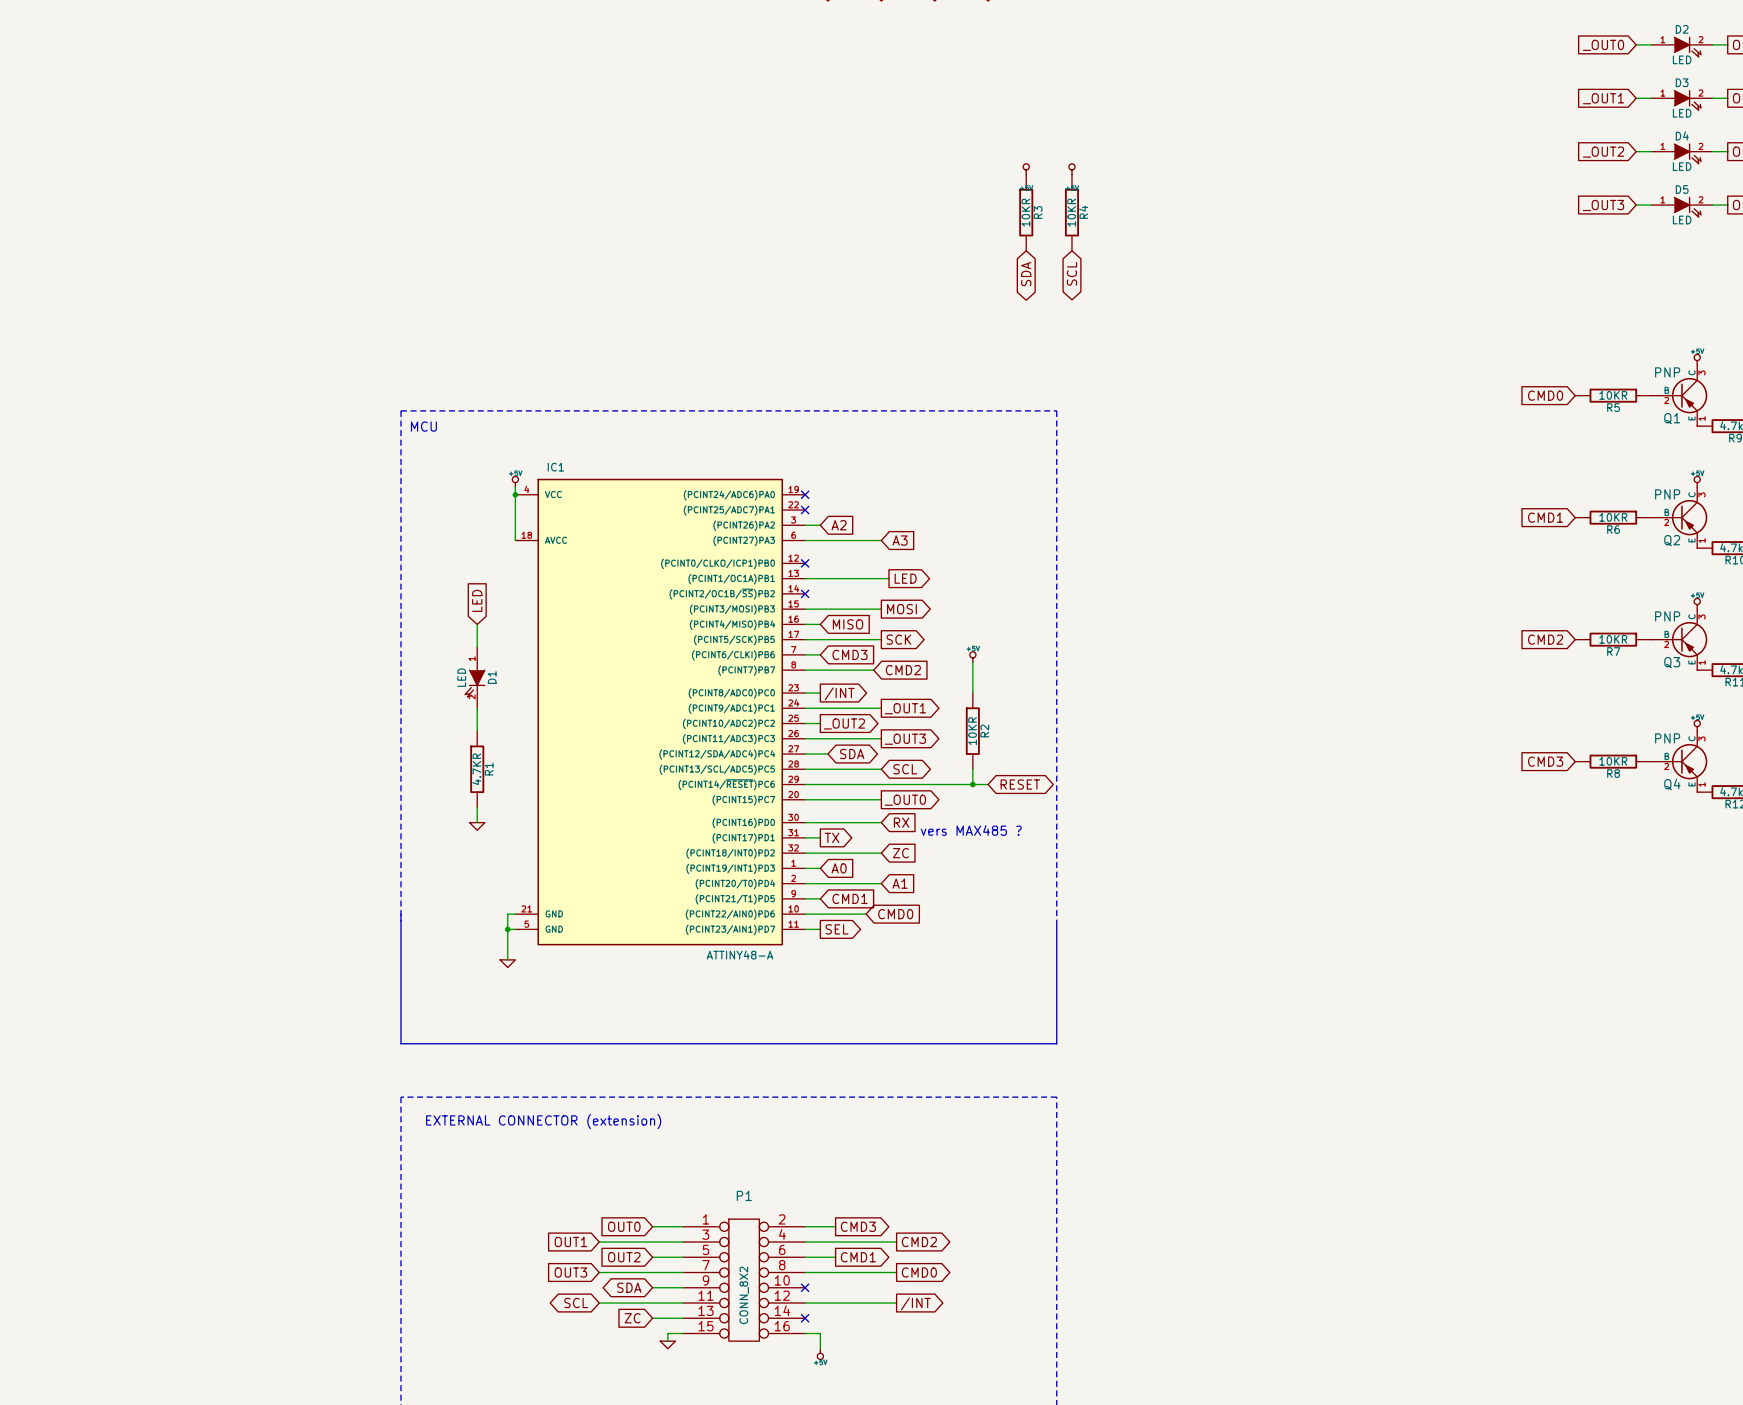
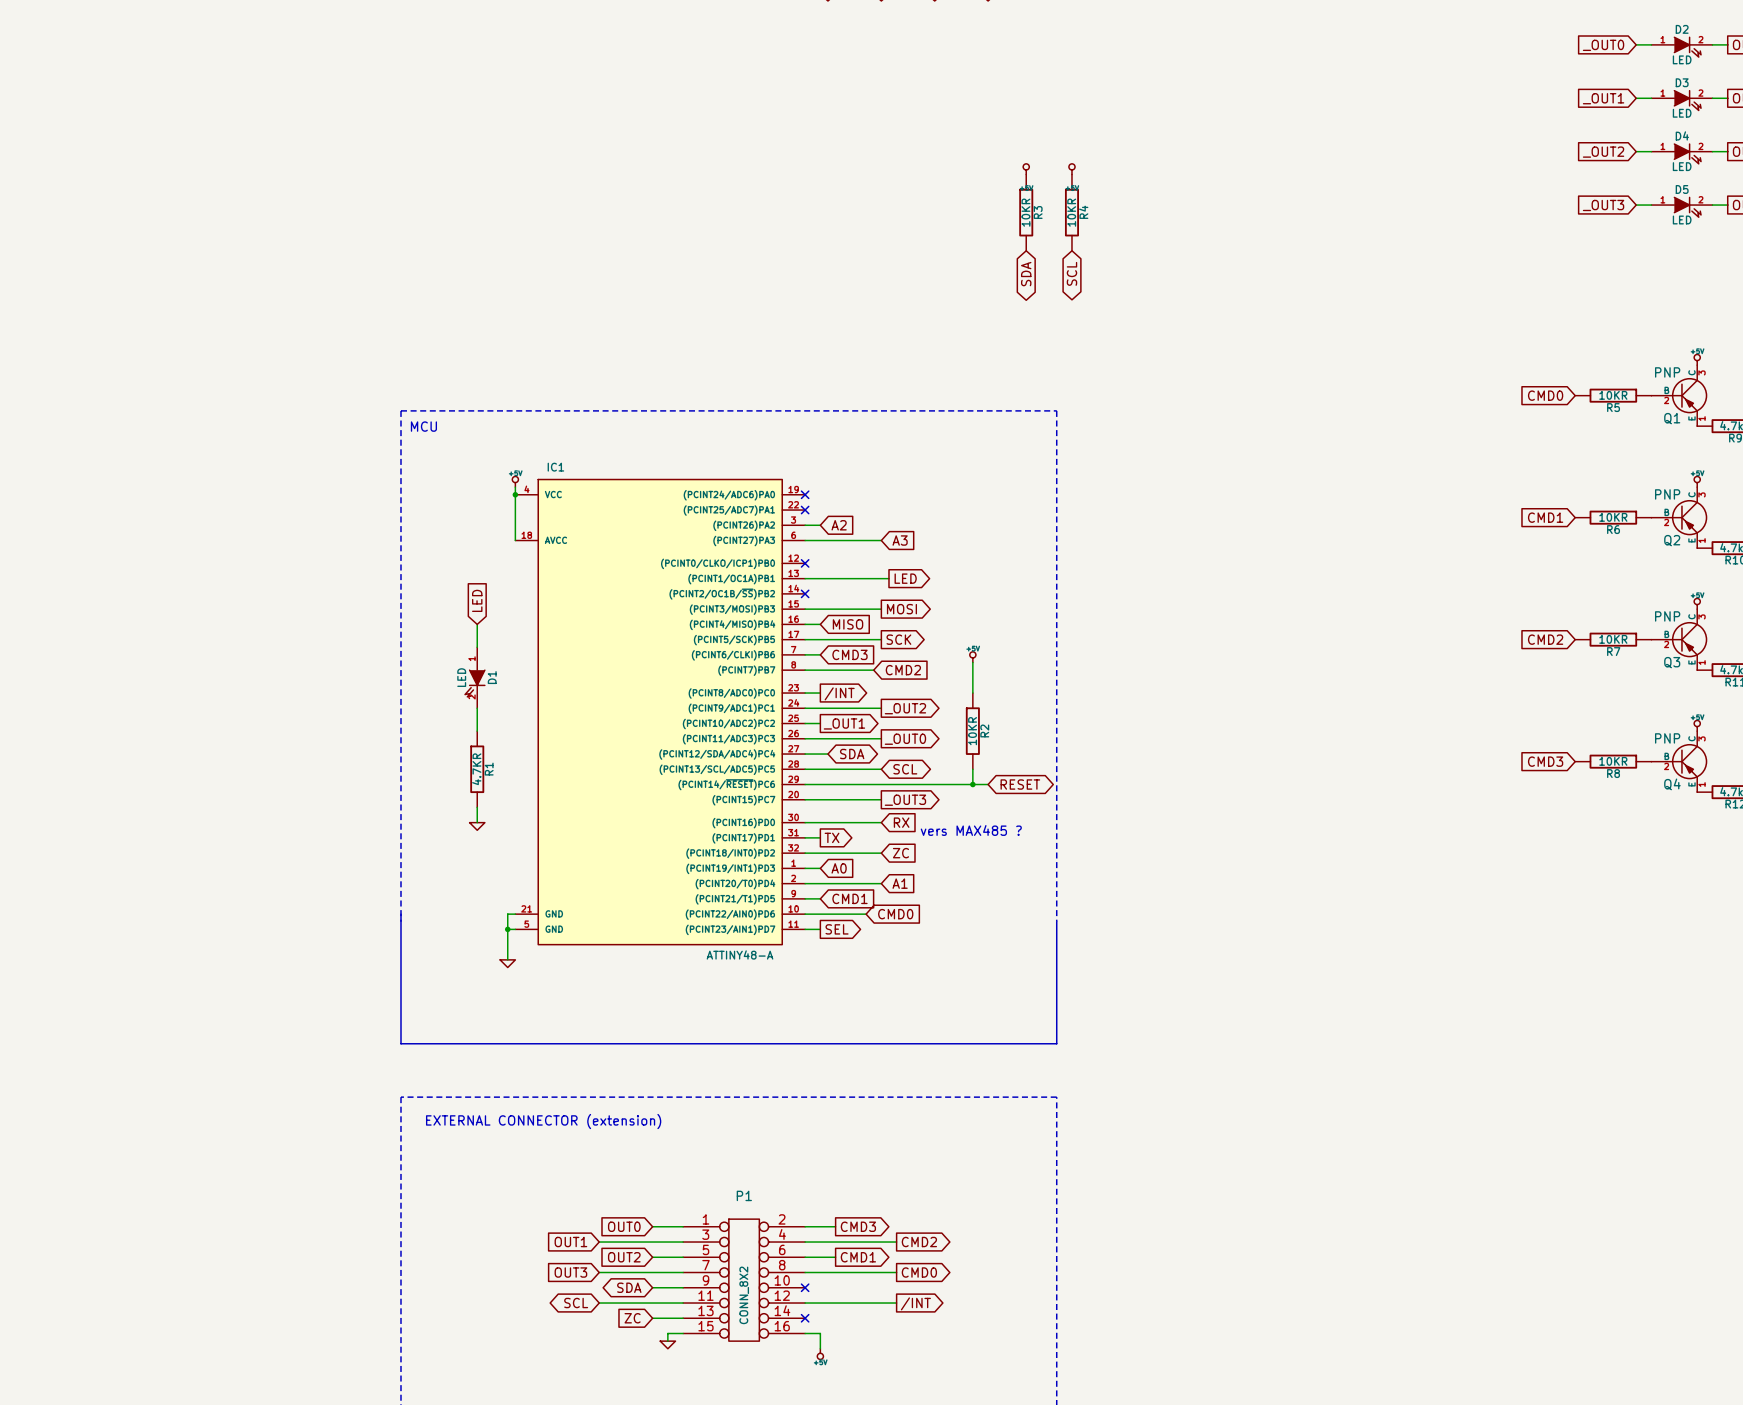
global label: _OUT1 (905, 708) -> _OUT2 (905, 708)
global label: _OUT2 (844, 723) -> _OUT1 (844, 723)
global label: _OUT3 (905, 739) -> _OUT0 (905, 739)
global label: _OUT0 (905, 800) -> _OUT3 (905, 800)

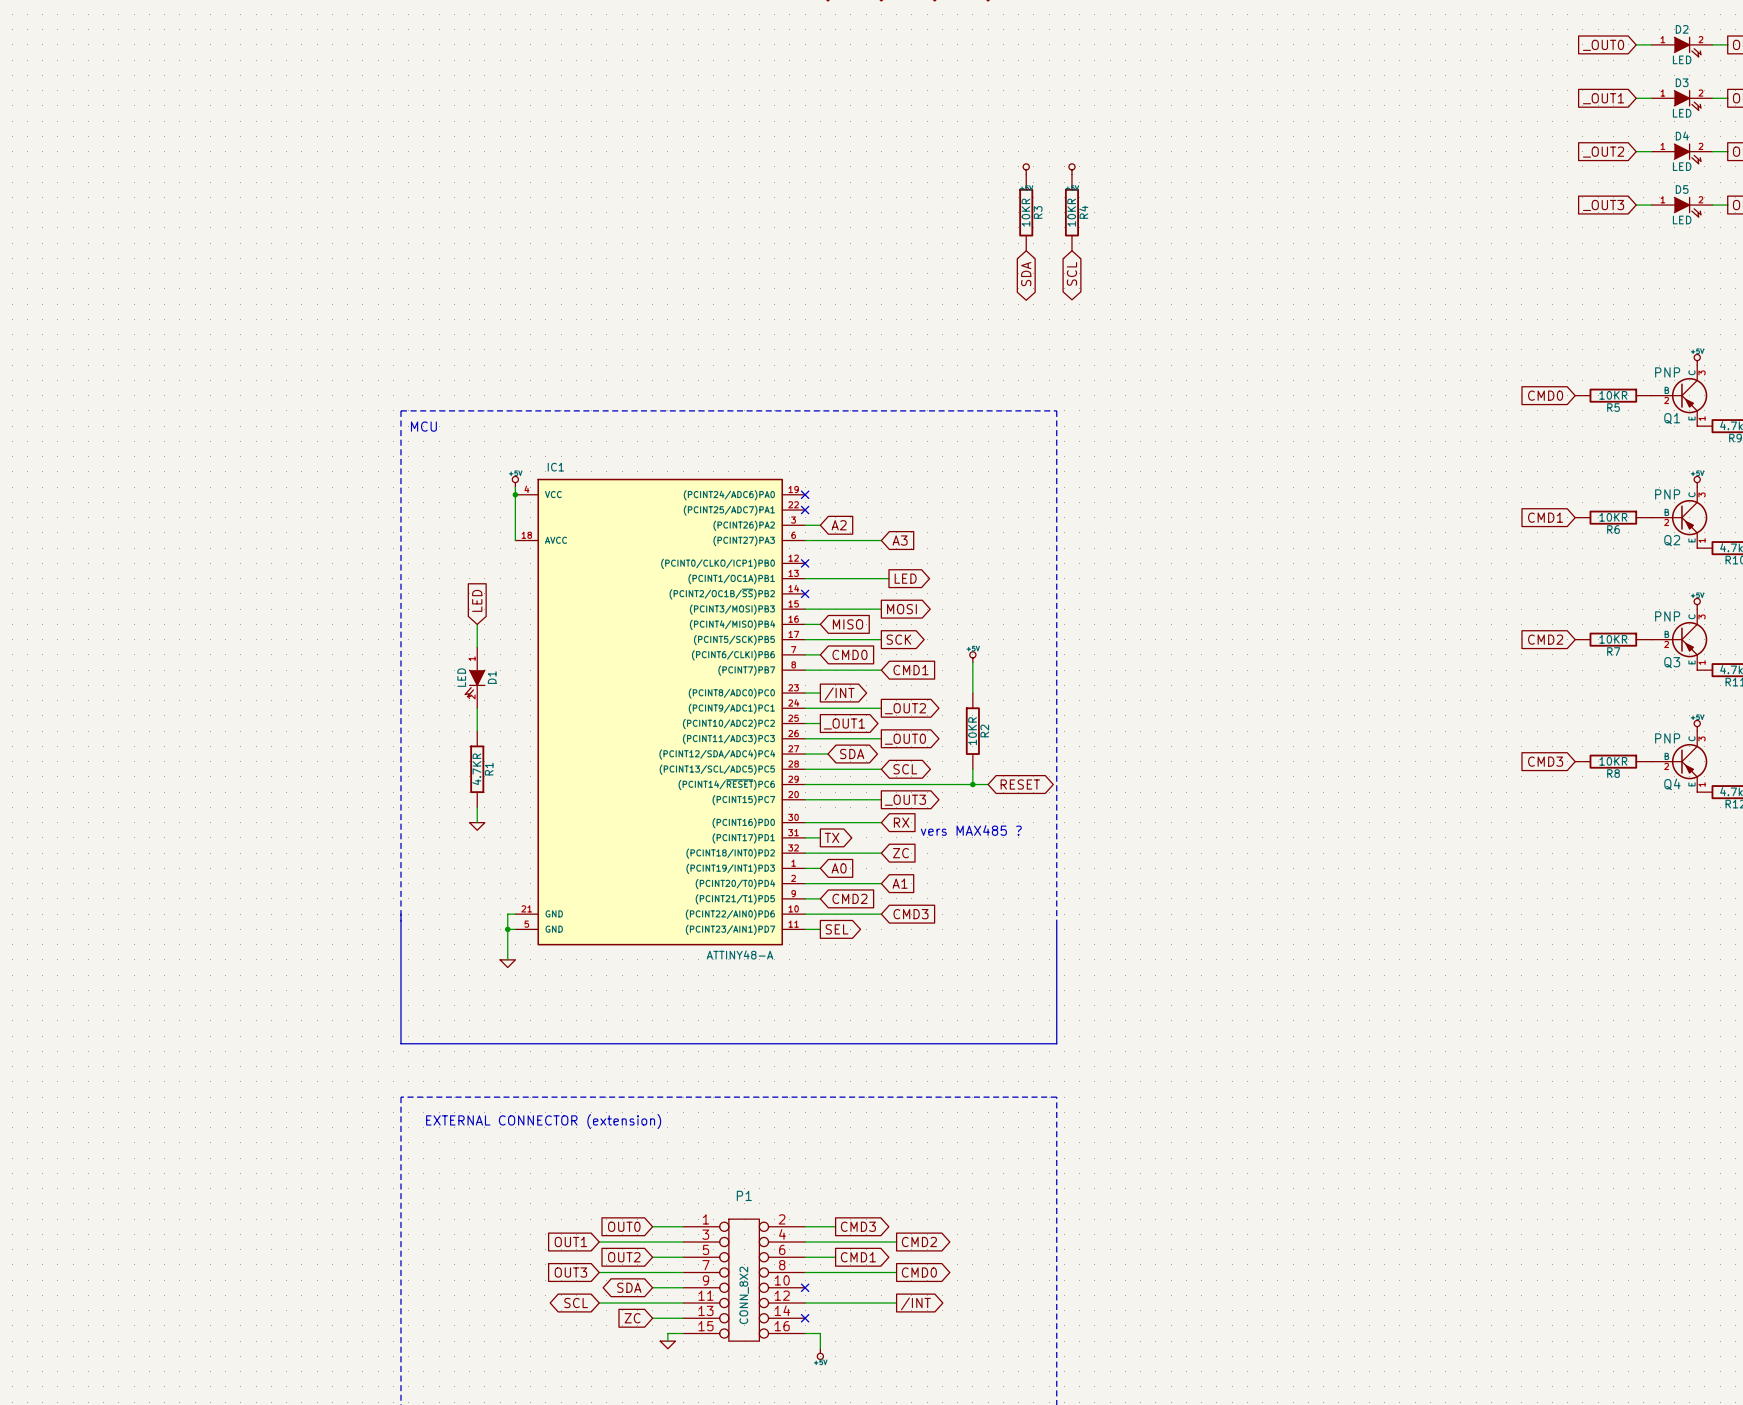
global label: CMD3 (849, 654) -> CMD0 (849, 654)
wire: none -> (873, 670) (881, 670)
global label: CMD2 (903, 670) -> CMD1 (910, 670)
global label: CMD1 (849, 898) -> CMD2 (849, 898)
wire: none -> (866, 914) (881, 914)
global label: CMD0 (895, 914) -> CMD3 (910, 914)

